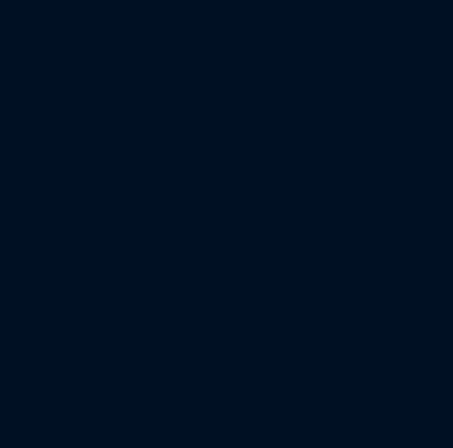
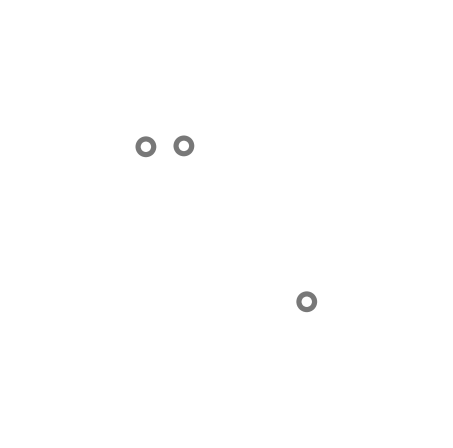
via: none -> (183, 145)
via: none -> (145, 146)
via: none -> (306, 301)

